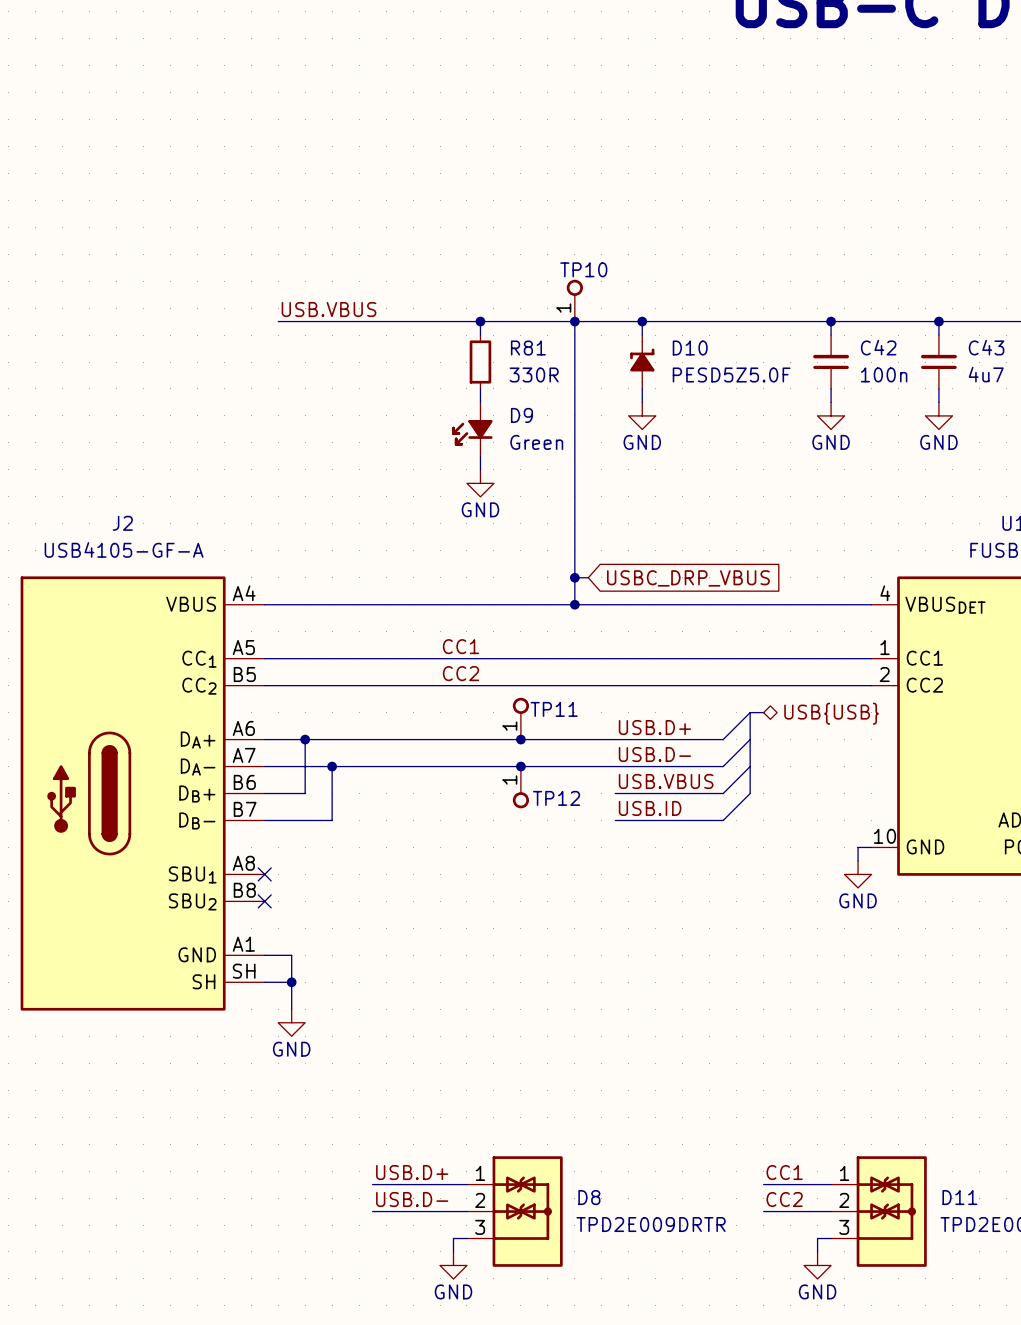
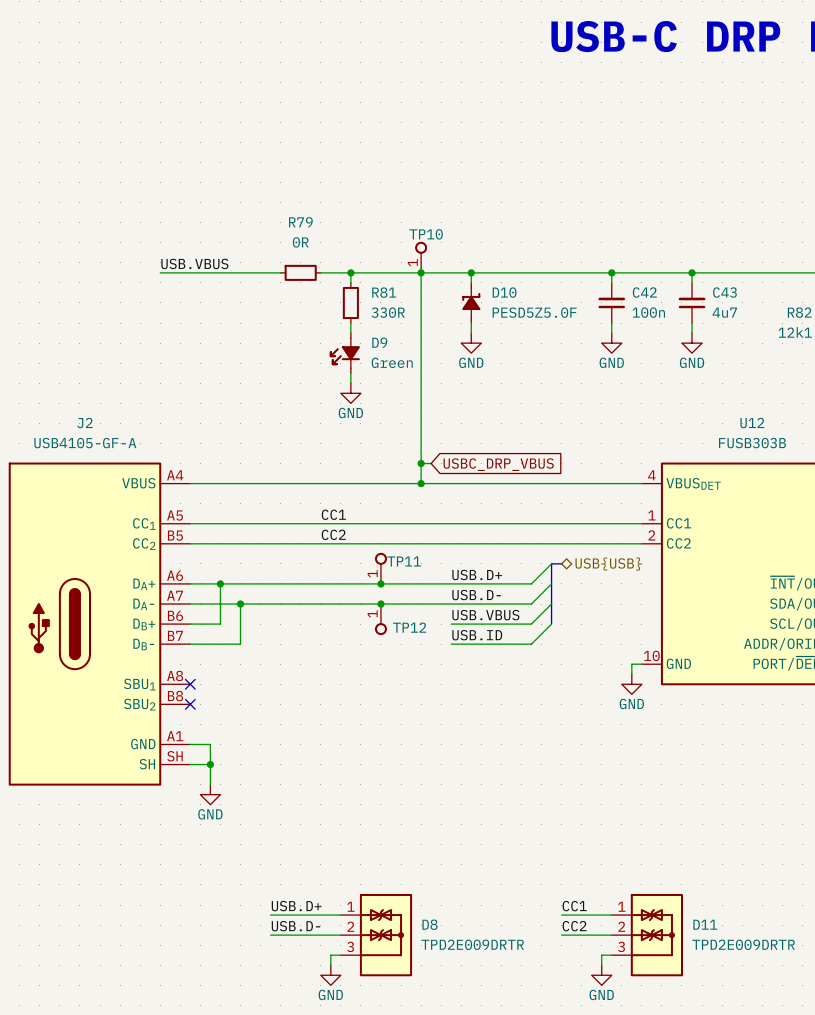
label position: USB.VBUS (329, 309) -> USB.VBUS (194, 263)
wire: (386, 321) (440, 321) -> (160, 272) (200, 272)
R79: none -> (300, 272)

